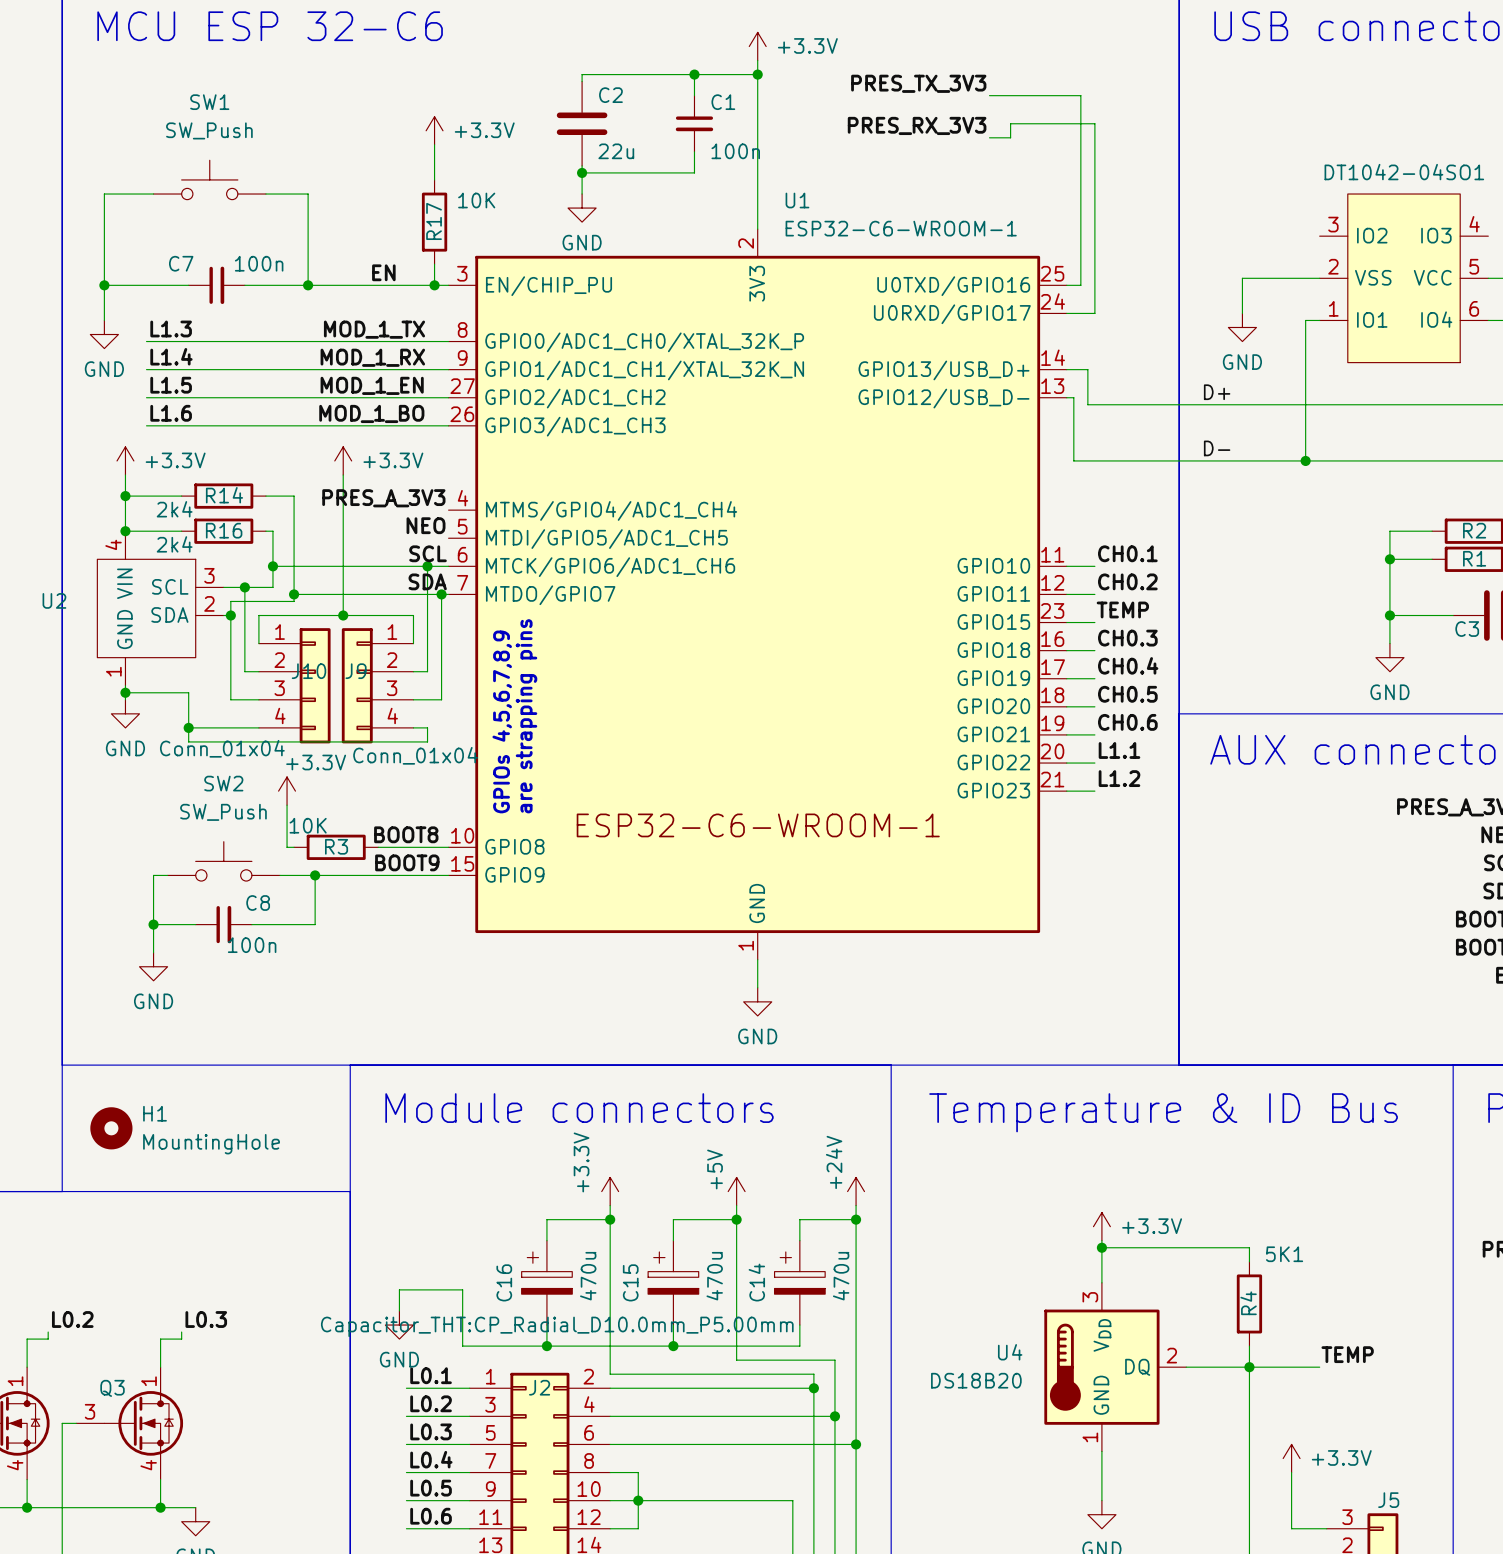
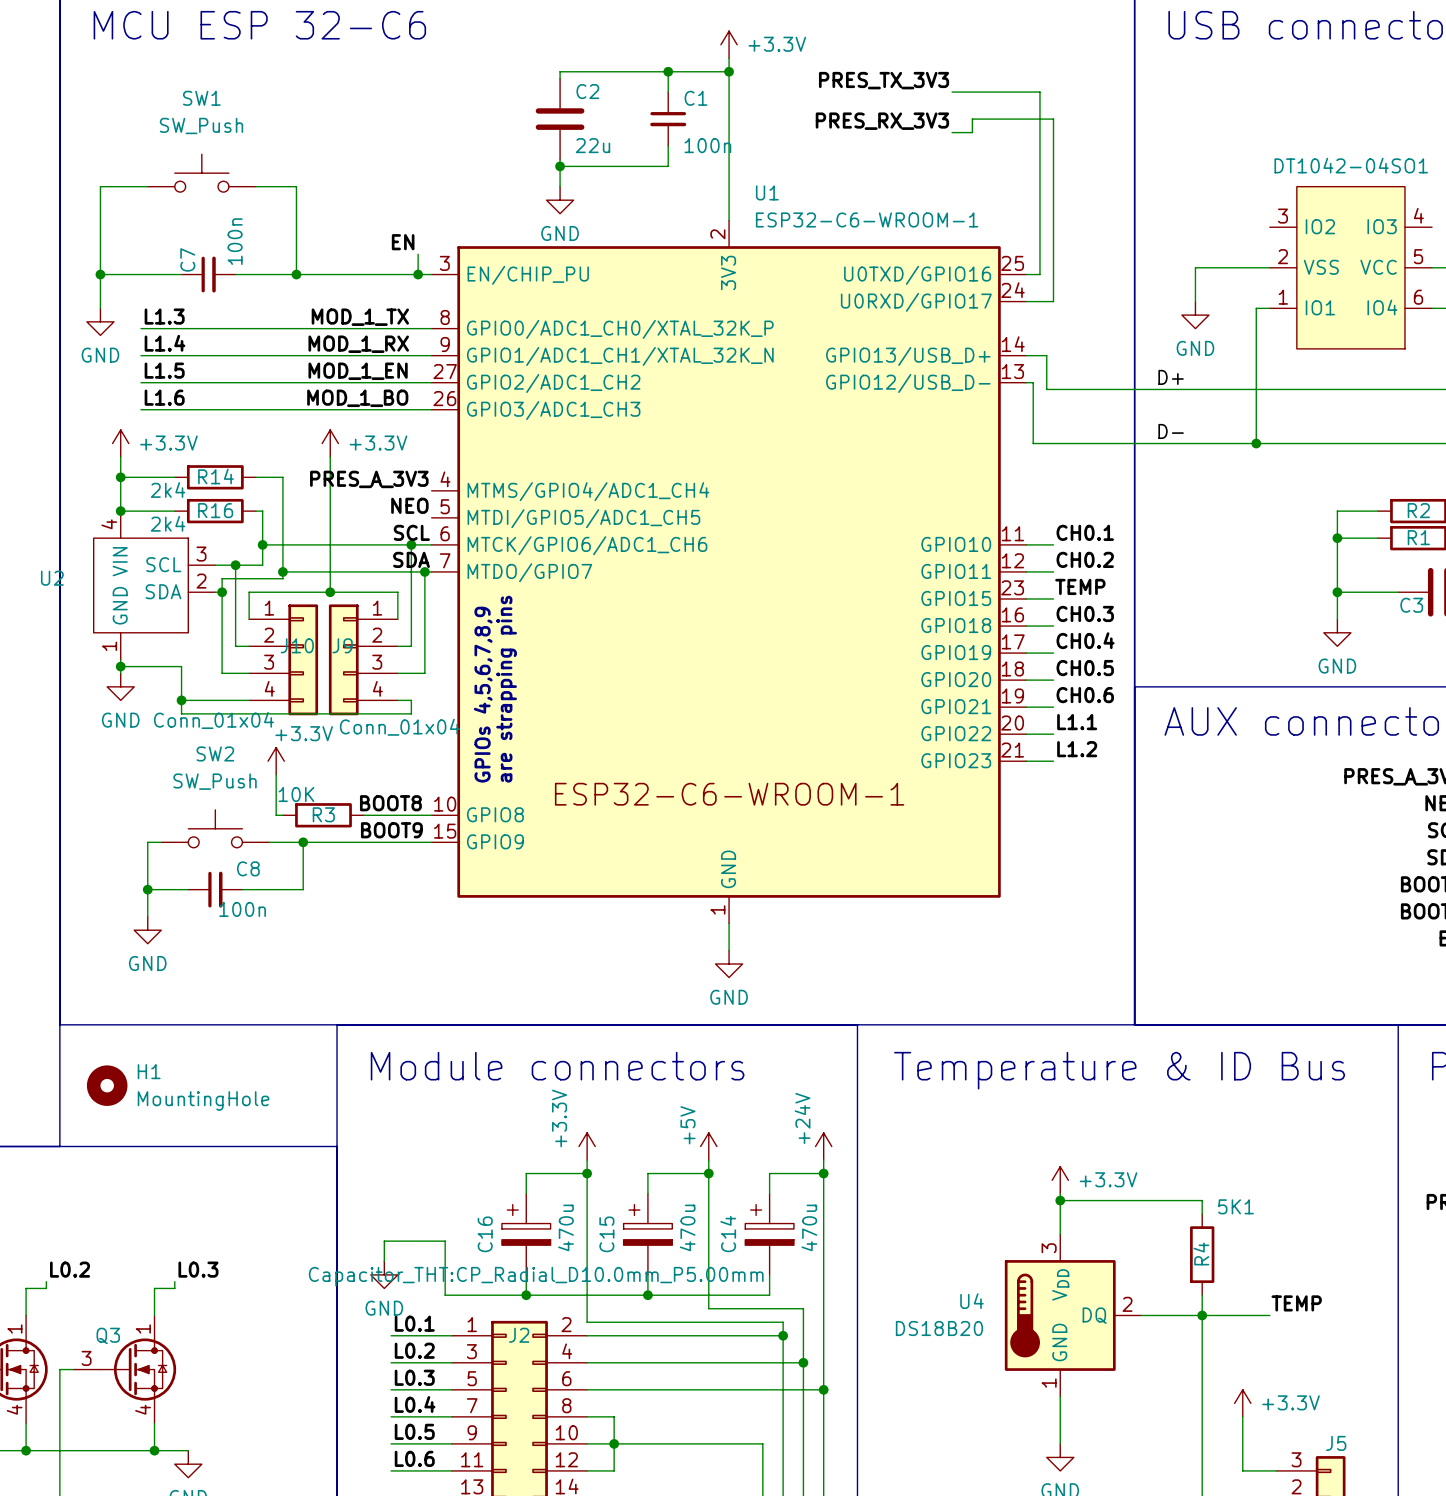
power symbol: +3.3V (434, 130) -> none
wire: (434, 144) (434, 179) -> none
R17: 10K (434, 222) -> none
C7 name rotation: 0° (181, 263) -> 90° counterclockwise (187, 259)
C7 value rotation: 0° (259, 263) -> 90° counterclockwise (235, 241)
label position: EN (383, 272) -> EN (403, 242)

